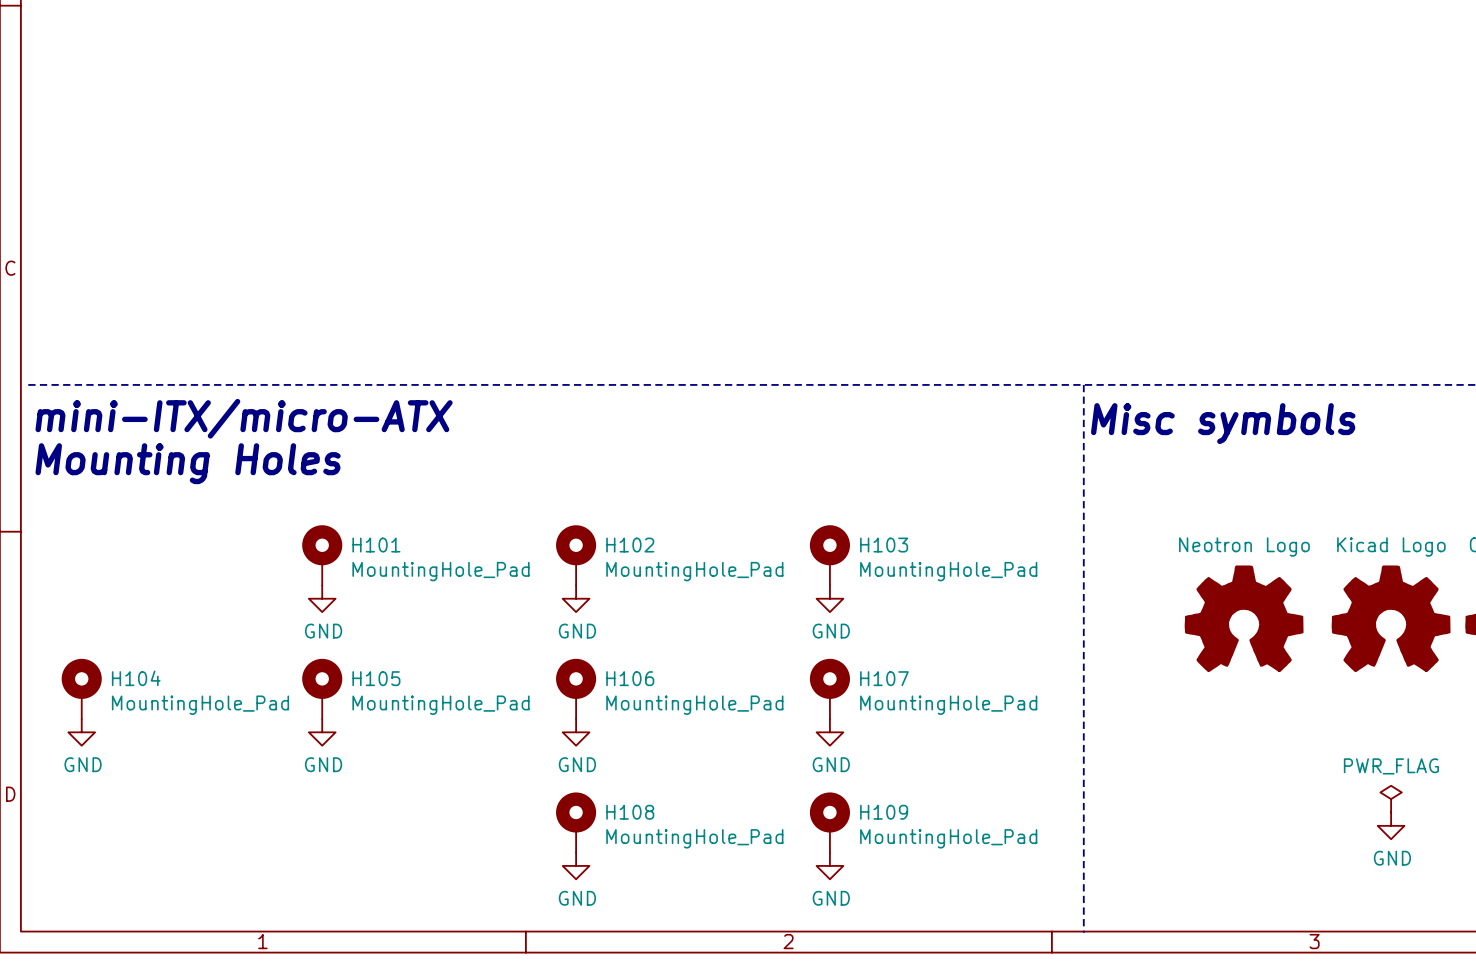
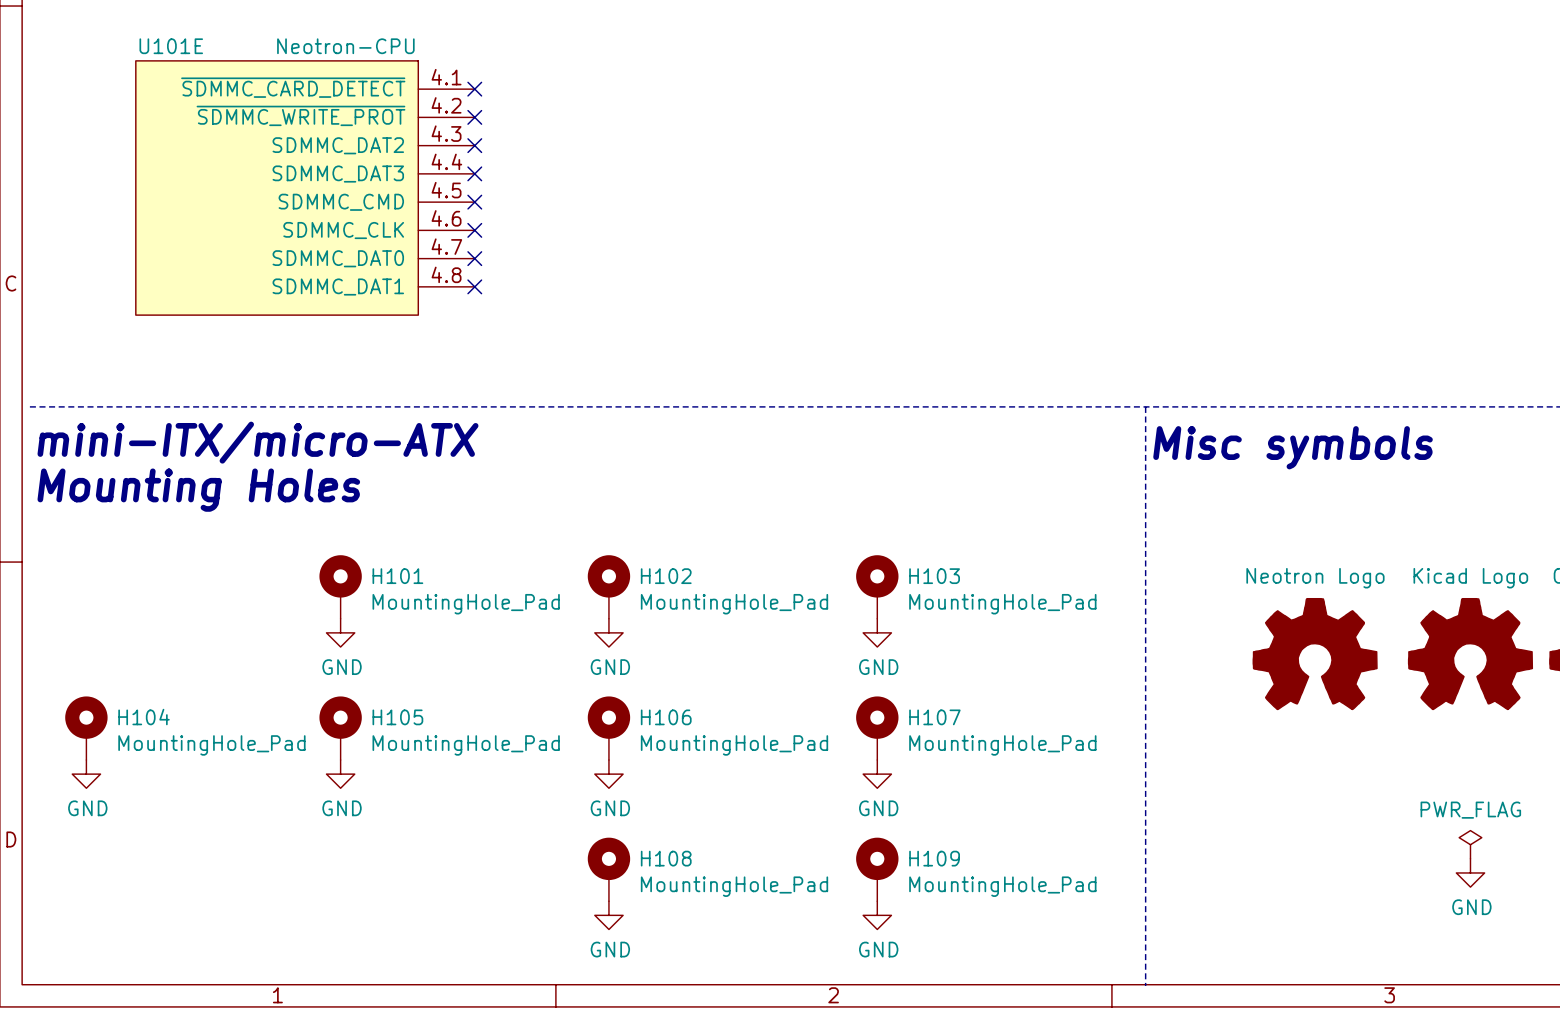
no-connect mark: none -> (474, 89)
no-connect mark: none -> (474, 117)
no-connect mark: none -> (474, 145)
no-connect mark: none -> (474, 173)
U101E: none -> Neotron-CPU (305, 188)
no-connect mark: none -> (474, 202)
no-connect mark: none -> (474, 230)
no-connect mark: none -> (474, 258)
no-connect mark: none -> (474, 286)

